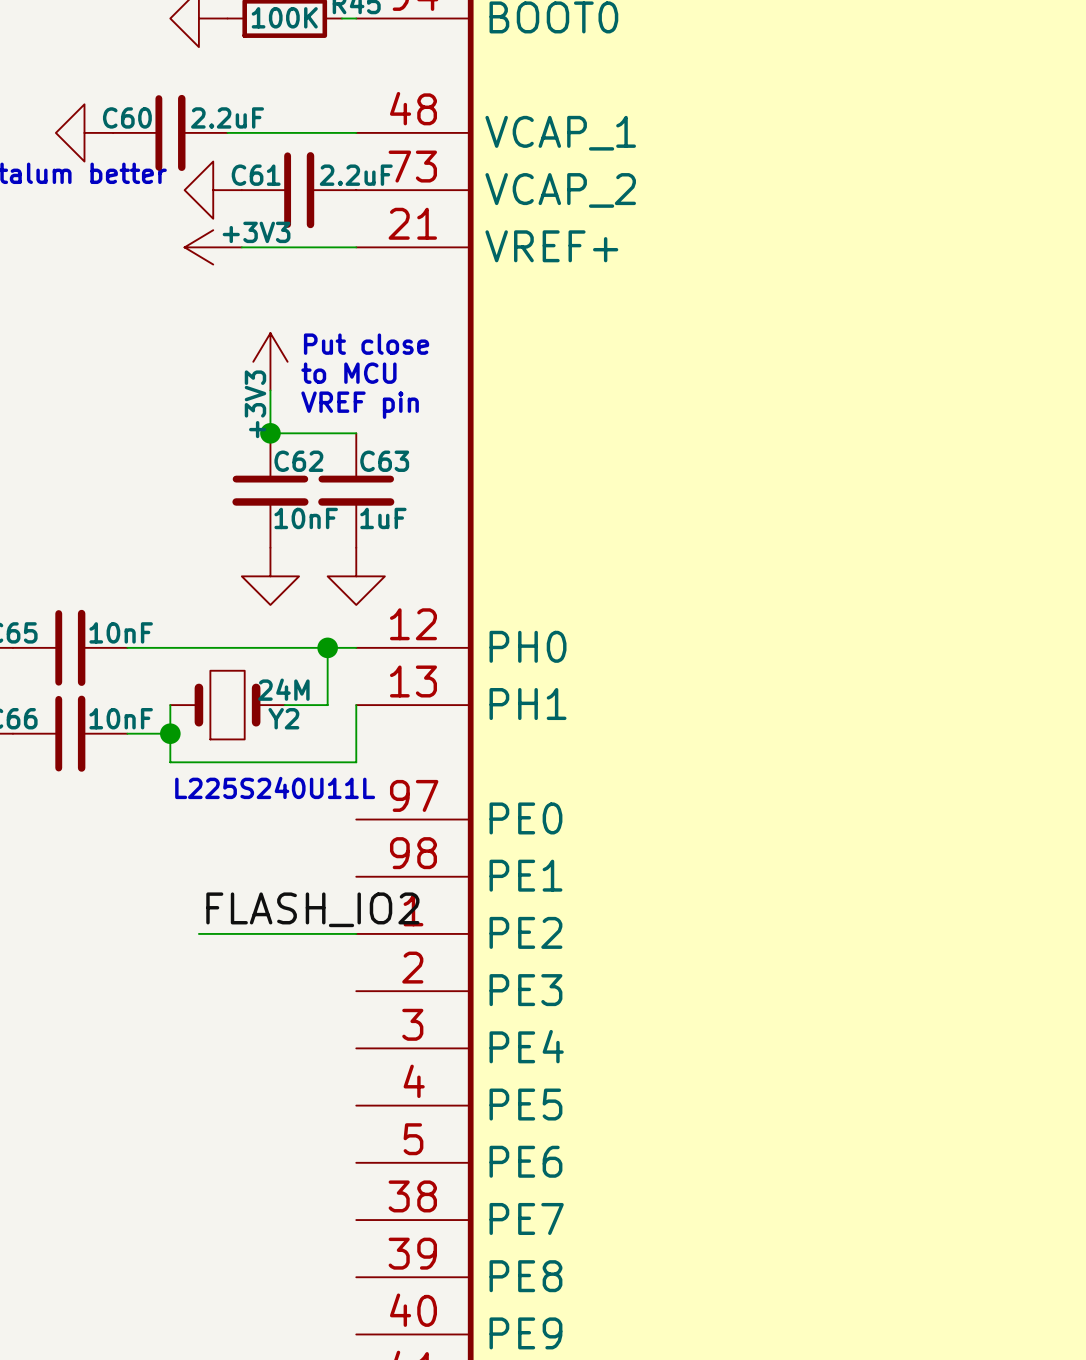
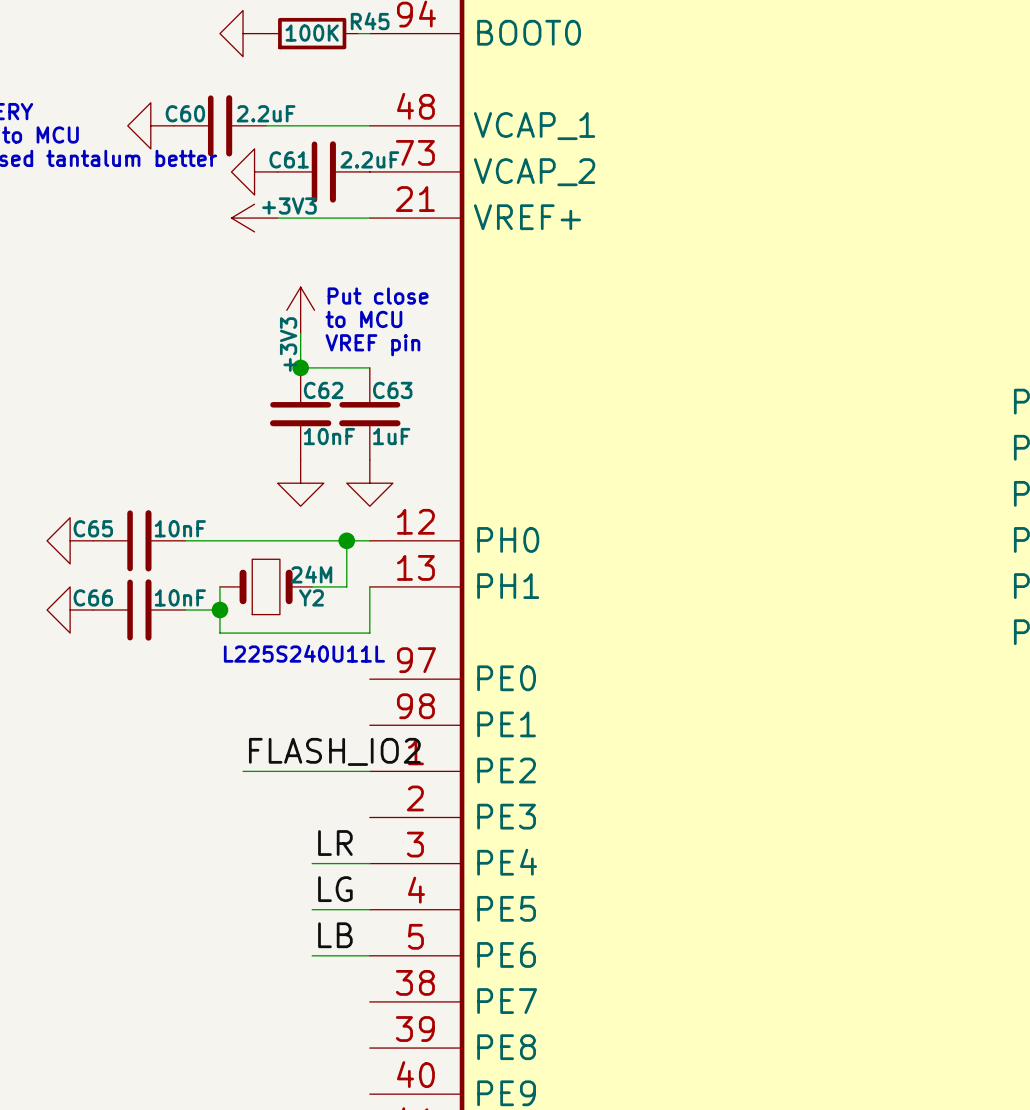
label: none -> LR (335, 843)
wire: none -> (312, 863) (369, 863)
label: none -> LG (335, 889)
wire: none -> (312, 909) (369, 909)
label: none -> LB (335, 935)
wire: none -> (312, 955) (369, 955)

